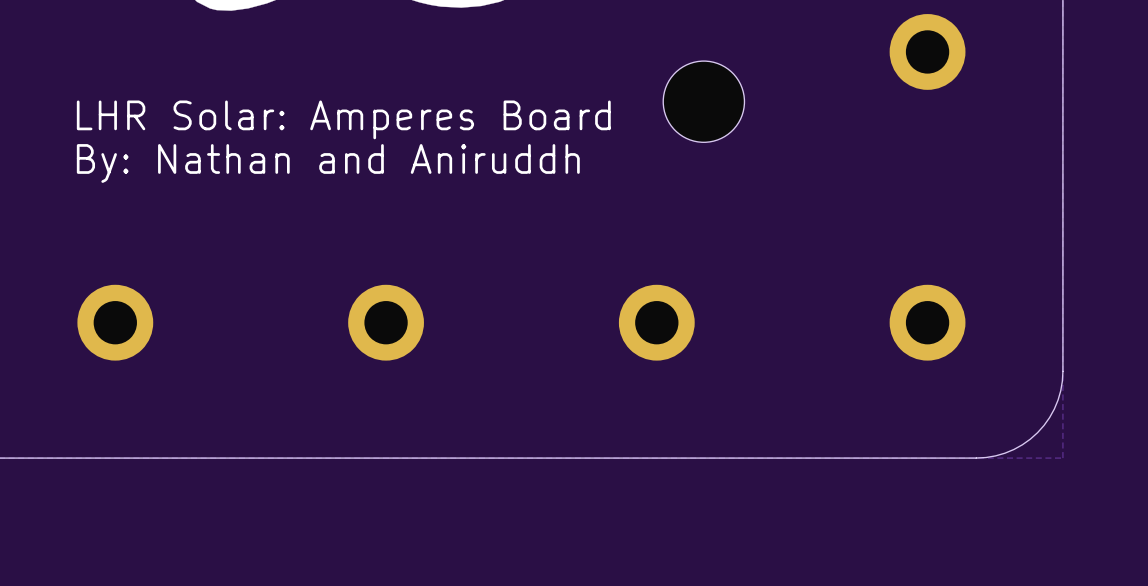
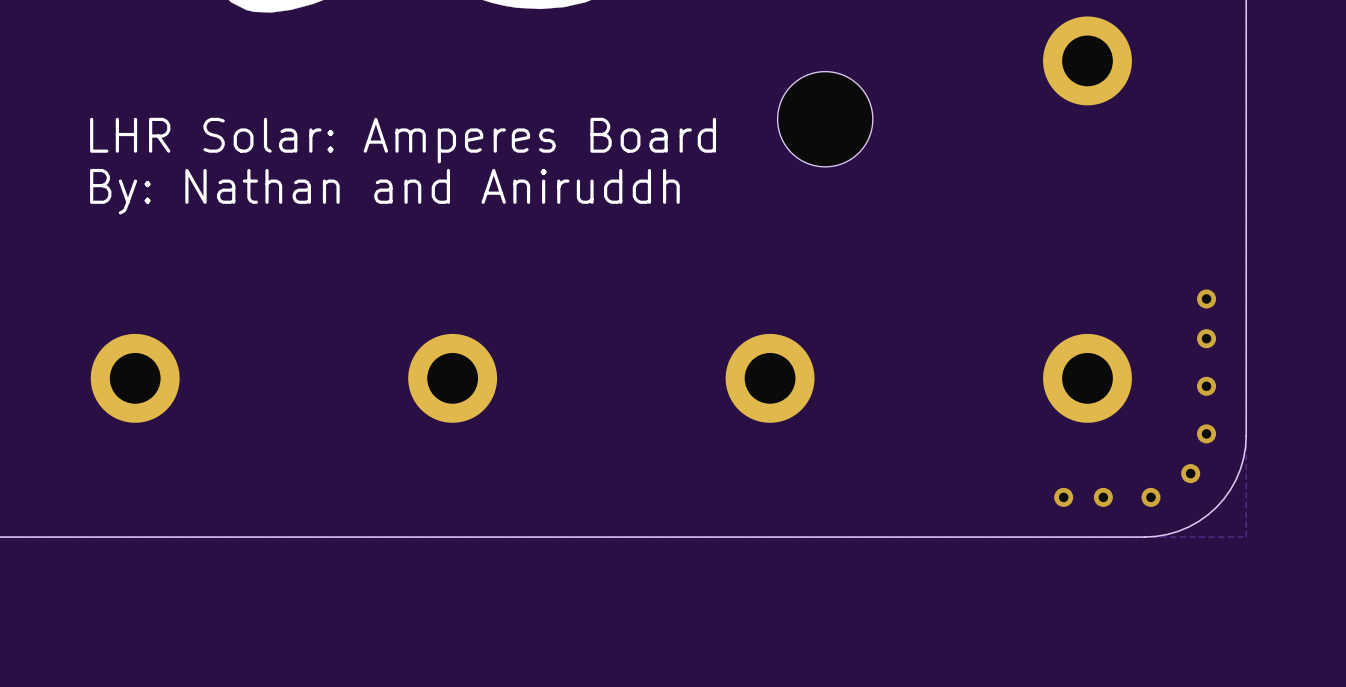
via: none -> (1206, 298)
via: none -> (1206, 338)
via: none -> (1206, 386)
via: none -> (1206, 433)
via: none -> (1190, 473)
via: none -> (1063, 497)
via: none -> (1103, 497)
via: none -> (1150, 497)

